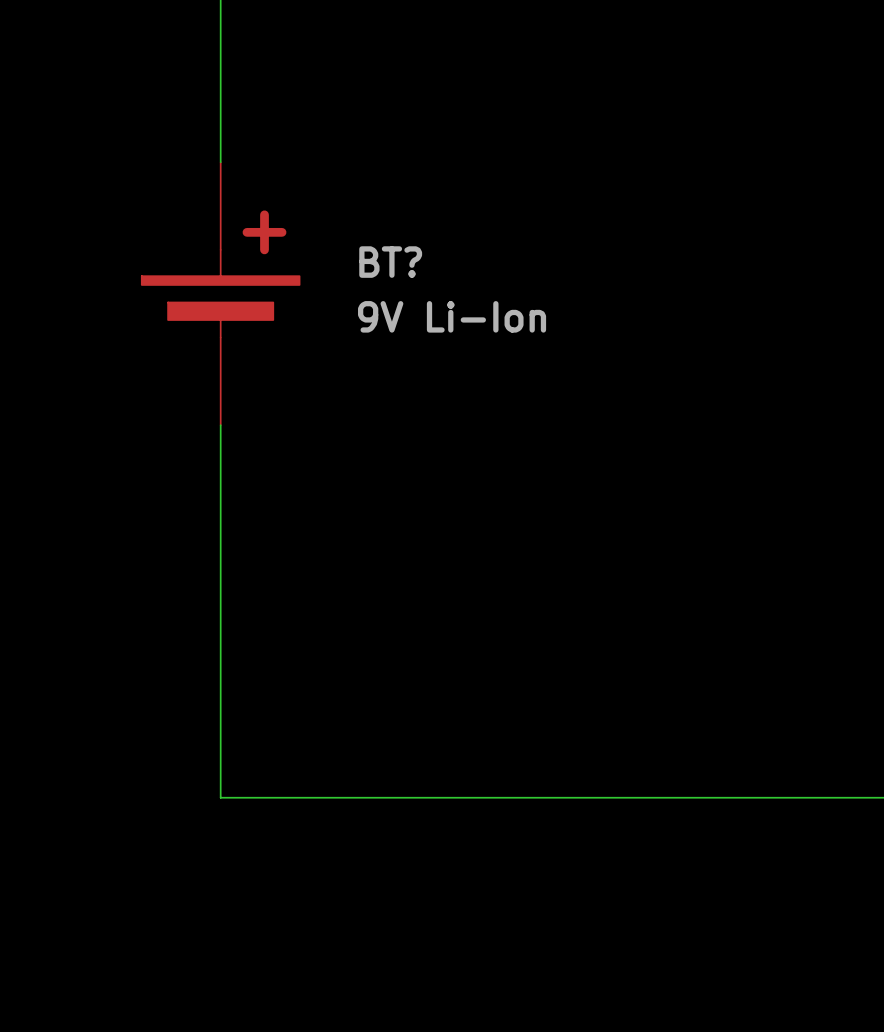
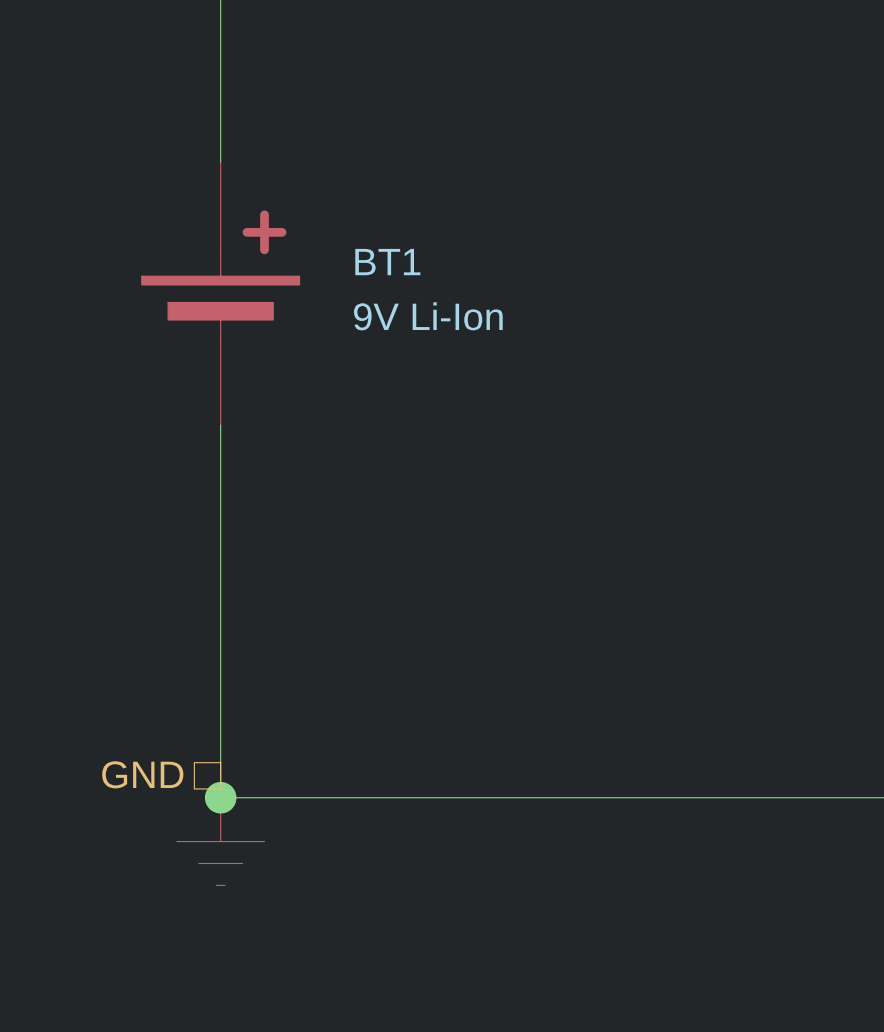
BT? name: BT? (390, 262) -> BT1 (387, 262)
hierarchical label: none -> GND (142, 774)
junction: none -> (220, 797)
power symbol: none -> (220, 841)

